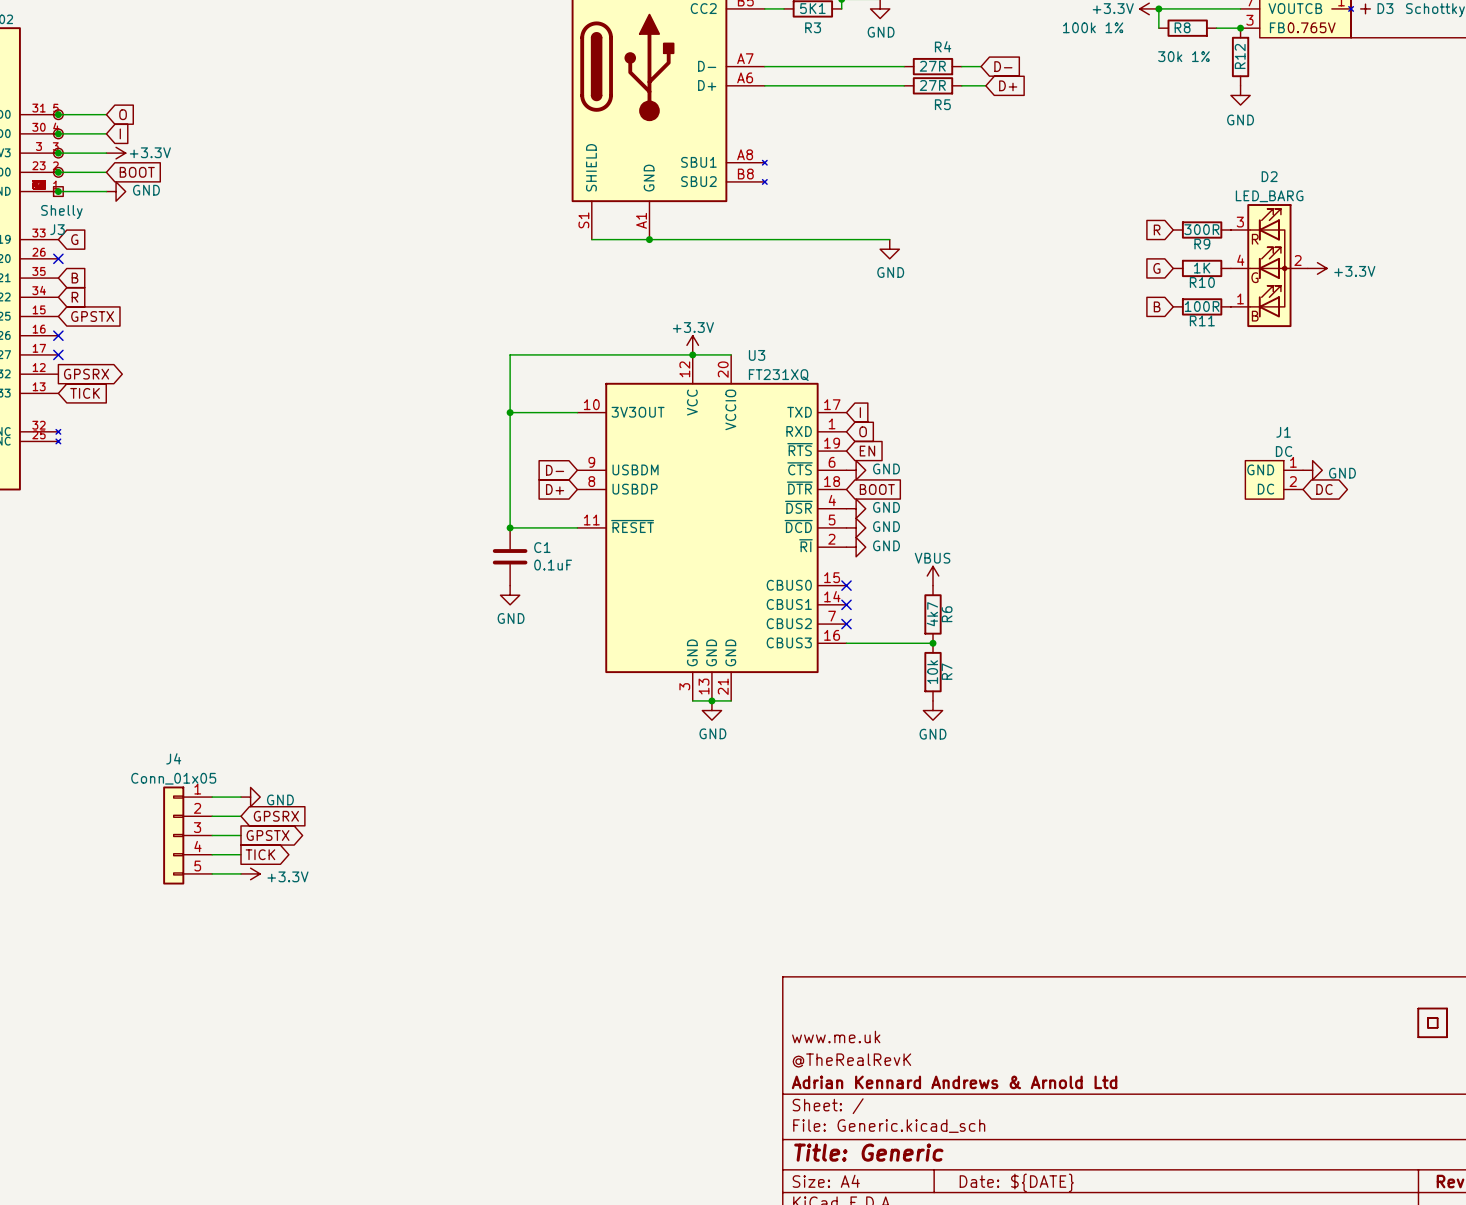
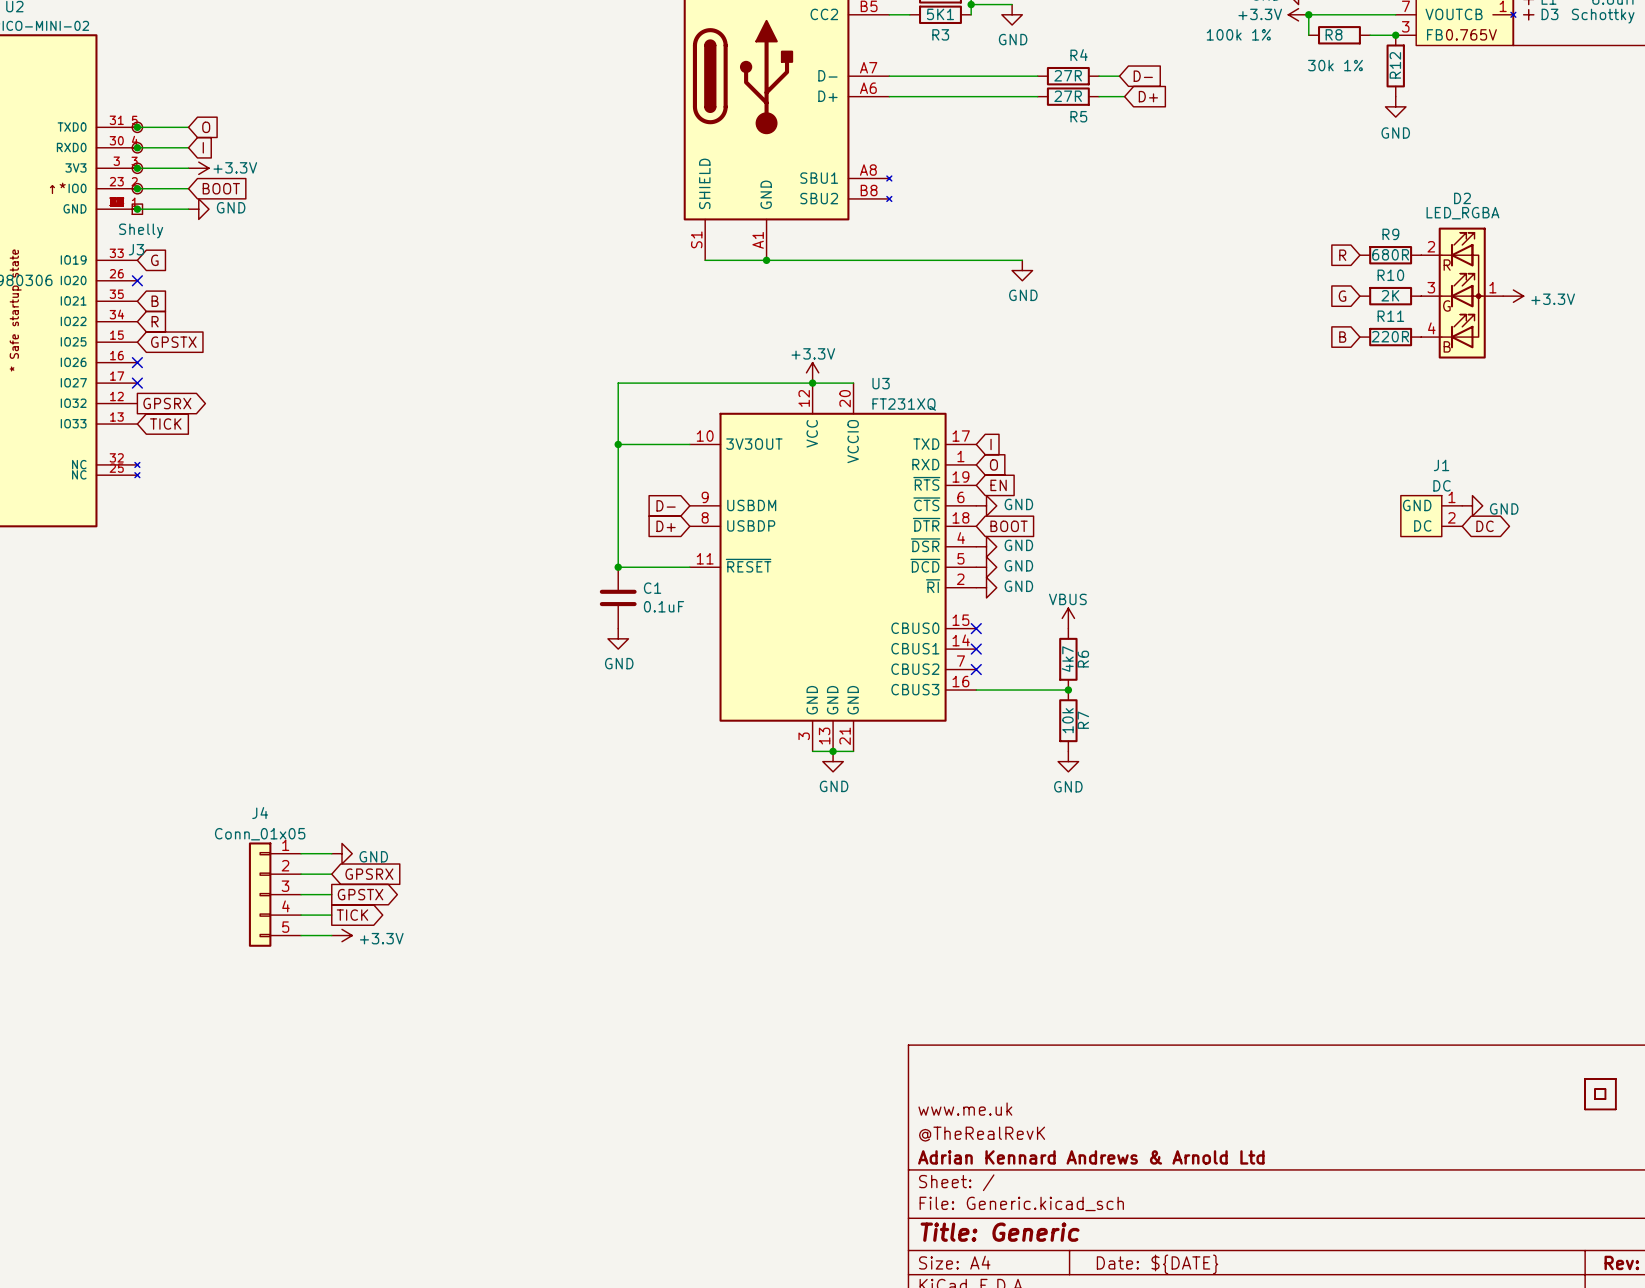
D2 value: LED_BARG (1269, 196) -> LED_RGBA (1462, 213)
D2 pin number: 3 (1240, 222) -> 2 (1431, 246)
R9 value: 300R (1201, 229) -> 680R (1390, 254)
global label position: R (1157, 230) -> R (1342, 255)
R9 position: (1202, 230) -> (1390, 255)
R9 name position: R9 (1202, 244) -> R9 (1390, 234)
D2 pin number: 4 (1240, 260) -> 3 (1431, 287)
D2 pin number: 2 (1298, 260) -> 1 (1492, 287)
D2 position: (1269, 265) -> (1462, 293)
global label position: G (1156, 268) -> G (1342, 296)
R10 position: (1202, 268) -> (1390, 296)
R10 value: 1K (1202, 268) -> 2K (1390, 295)
power symbol position: +3.3V (1317, 268) -> +3.3V (1513, 296)
R10 name position: R10 (1202, 282) -> R10 (1390, 275)
D2 pin number: 1 (1240, 298) -> 4 (1431, 328)
global label position: B (1157, 306) -> B (1342, 337)
R11 position: (1202, 306) -> (1390, 337)
R11 value: 100R (1202, 306) -> 220R (1390, 336)
R11 name position: R11 (1202, 320) -> R11 (1390, 316)

